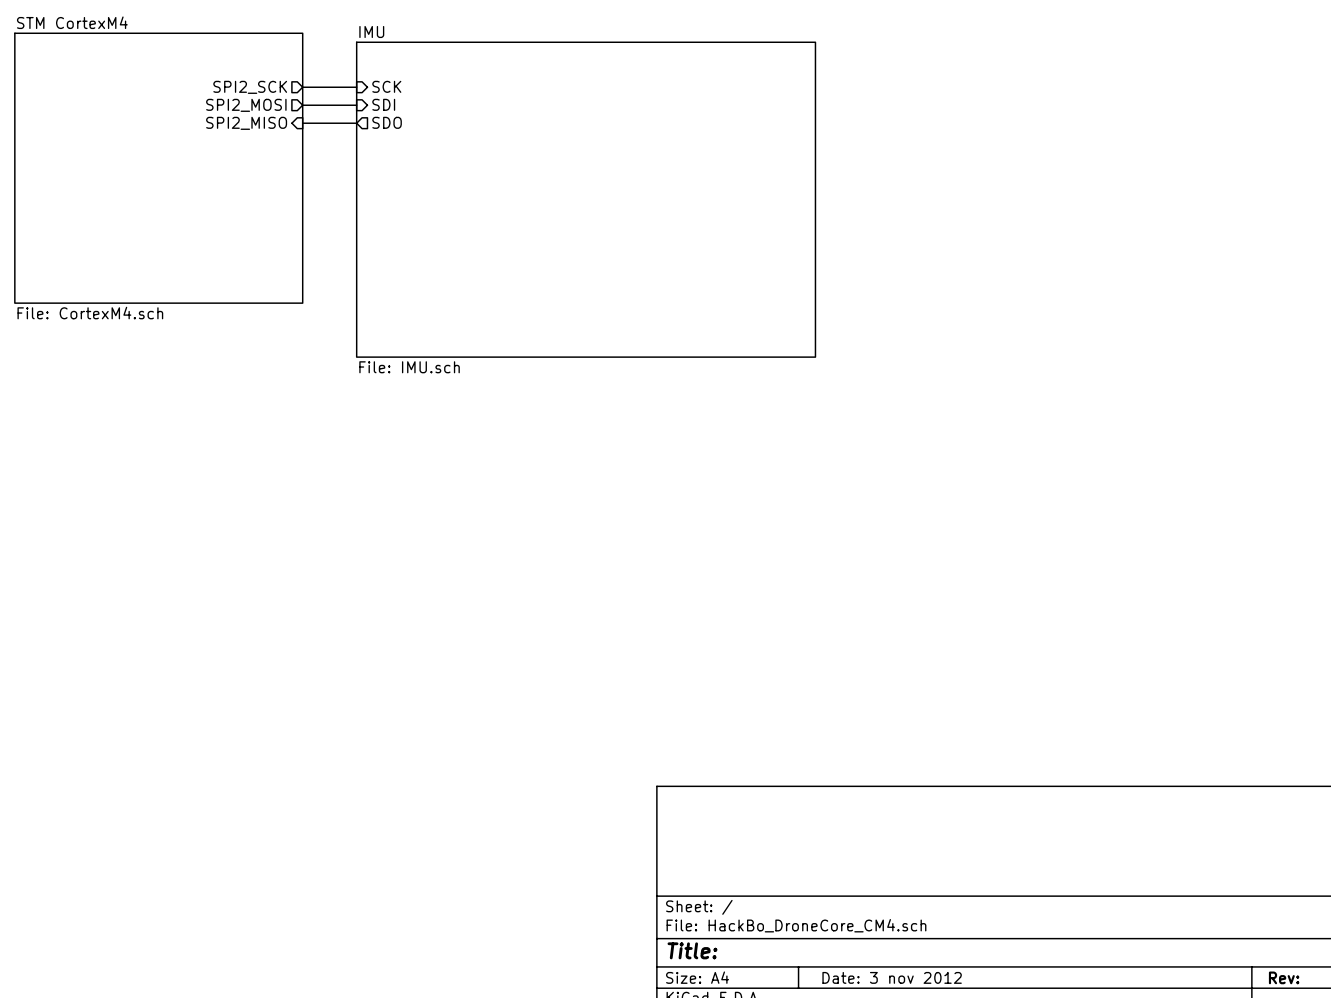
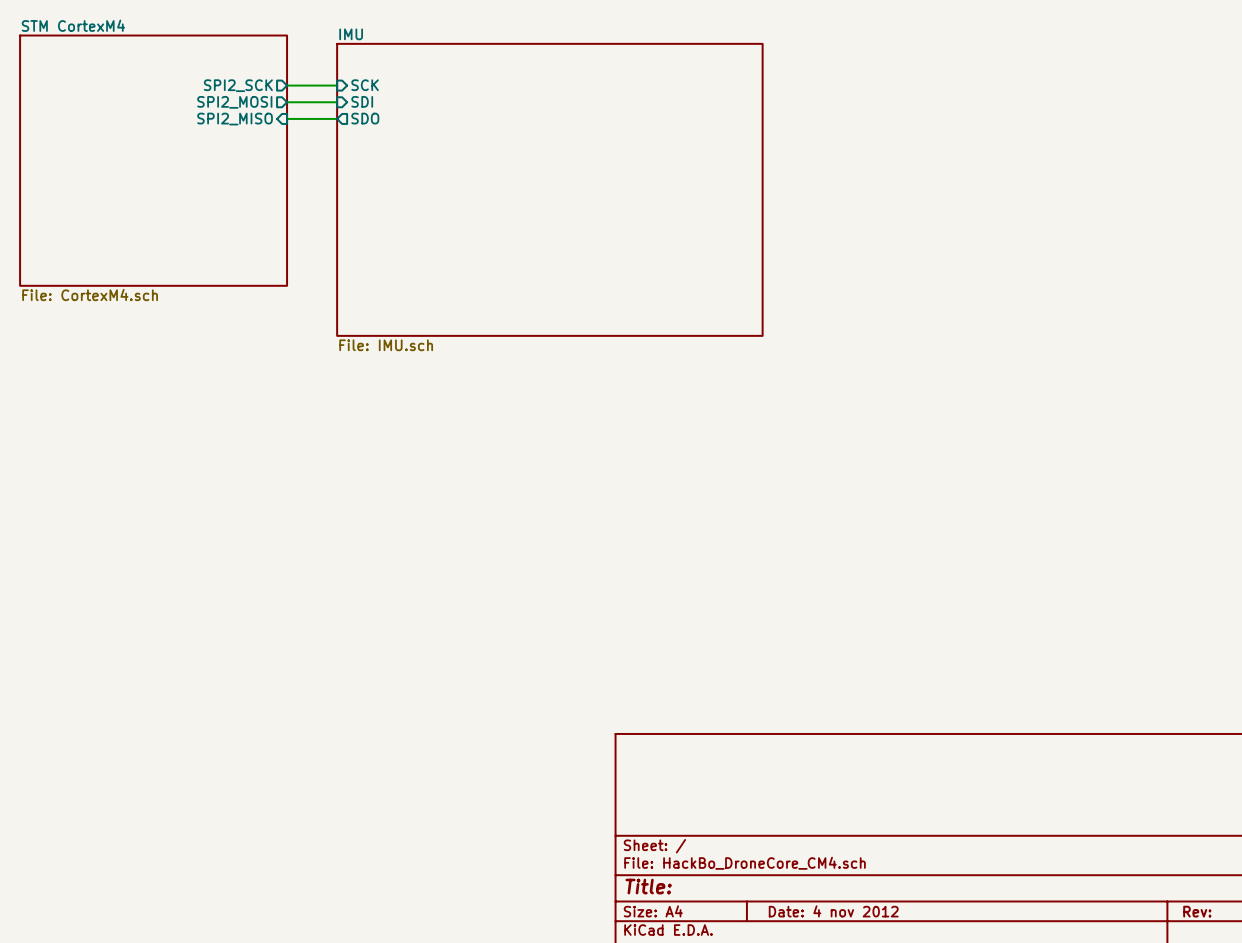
title block: Date: 3 nov 2012 (892, 977) -> Date: 4 nov 2012 (833, 911)

